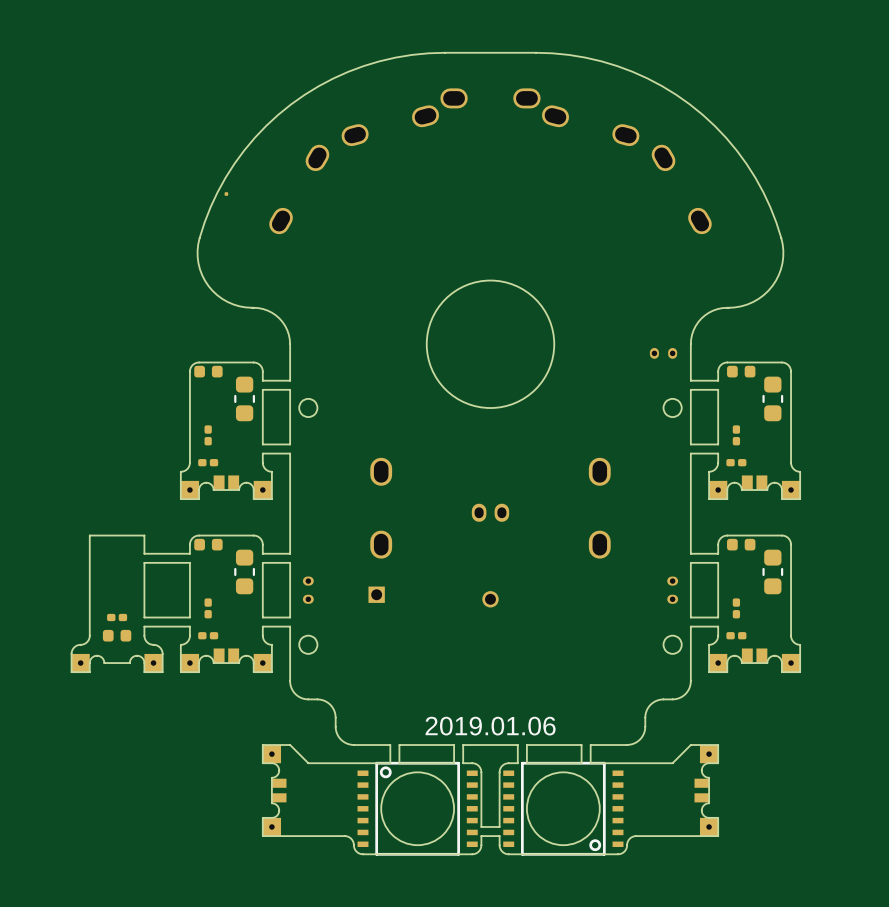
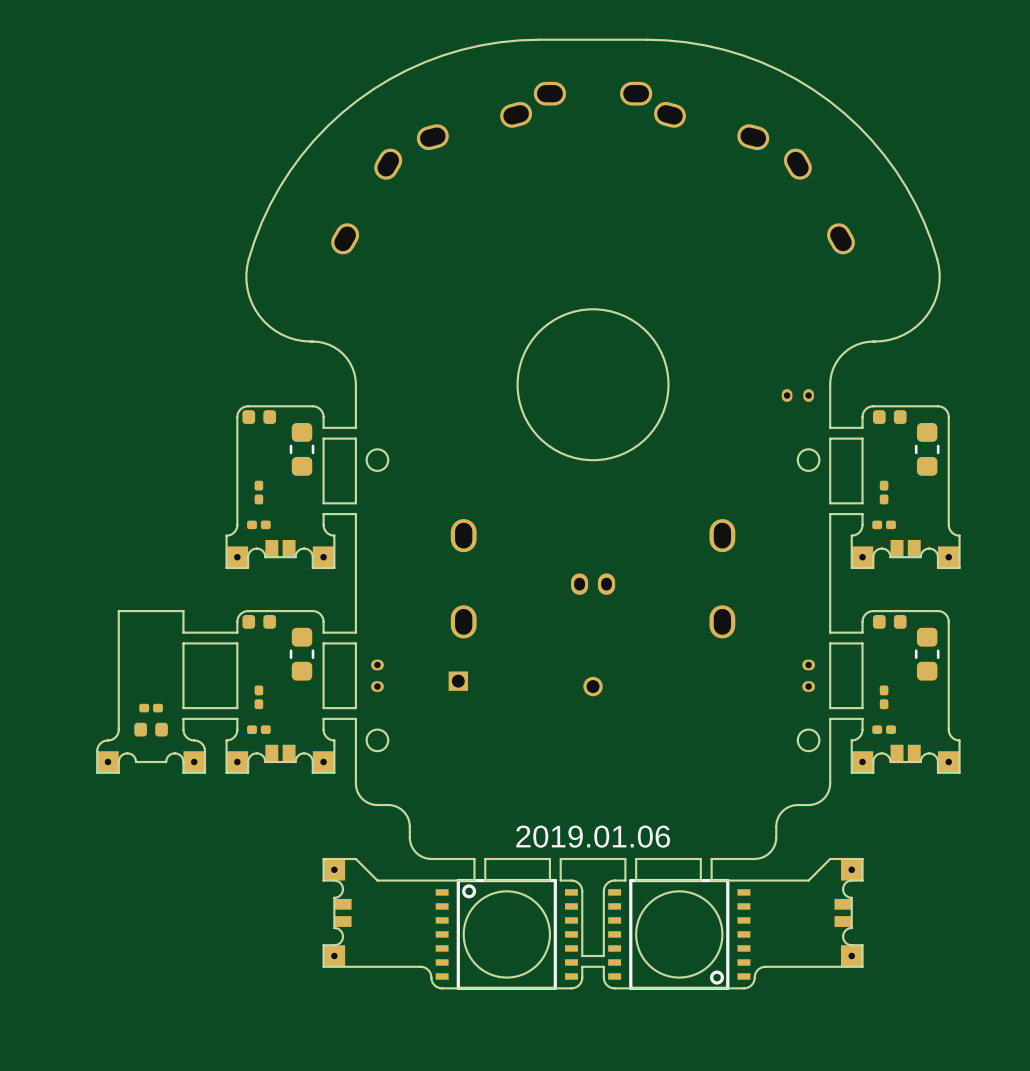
part: (226, 194) -> none

